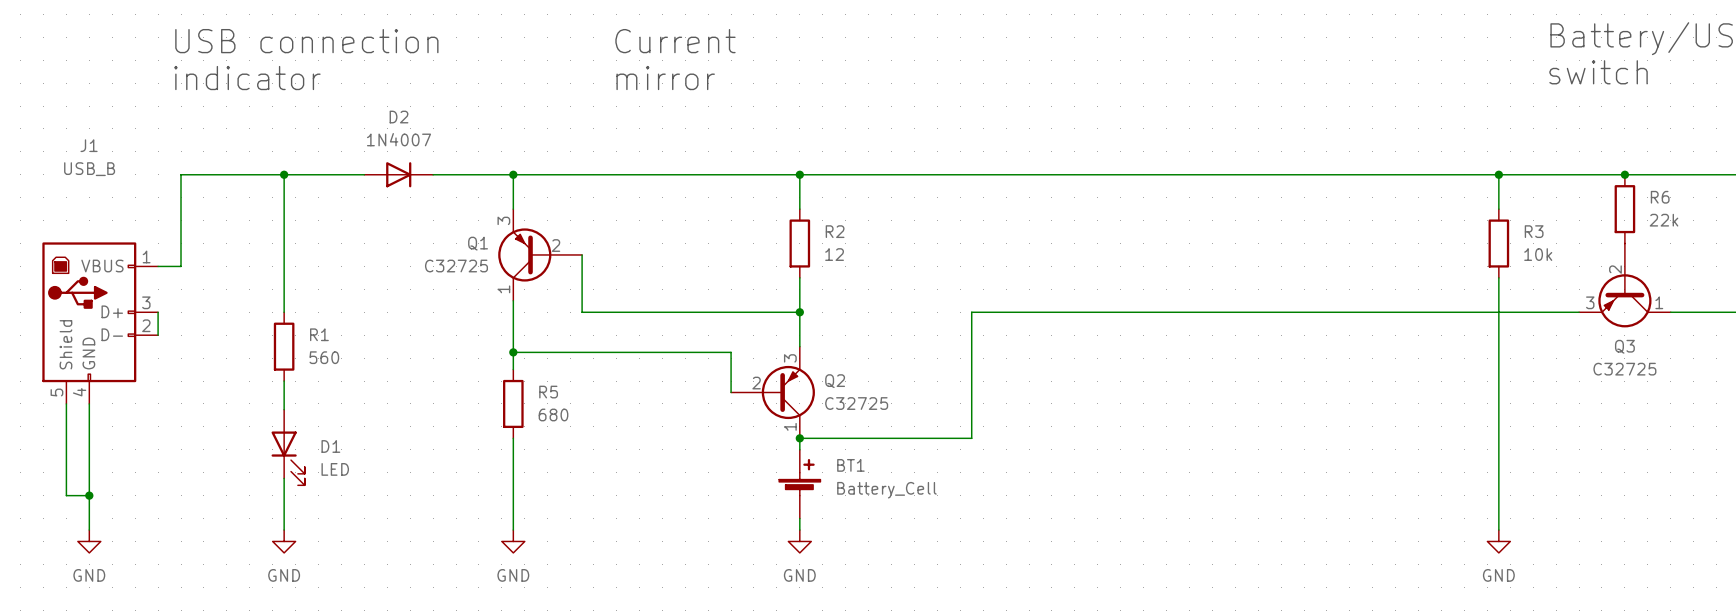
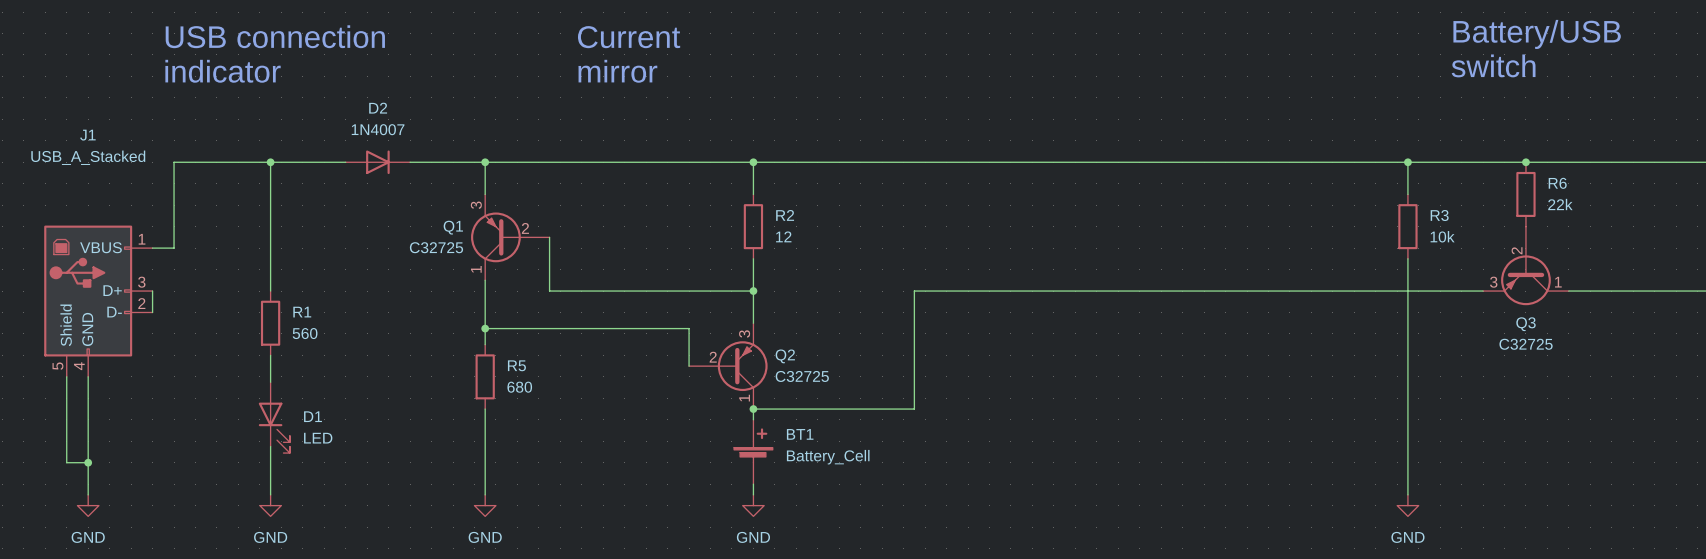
J1 value: USB_B (89, 169) -> USB_A_Stacked (88, 157)

